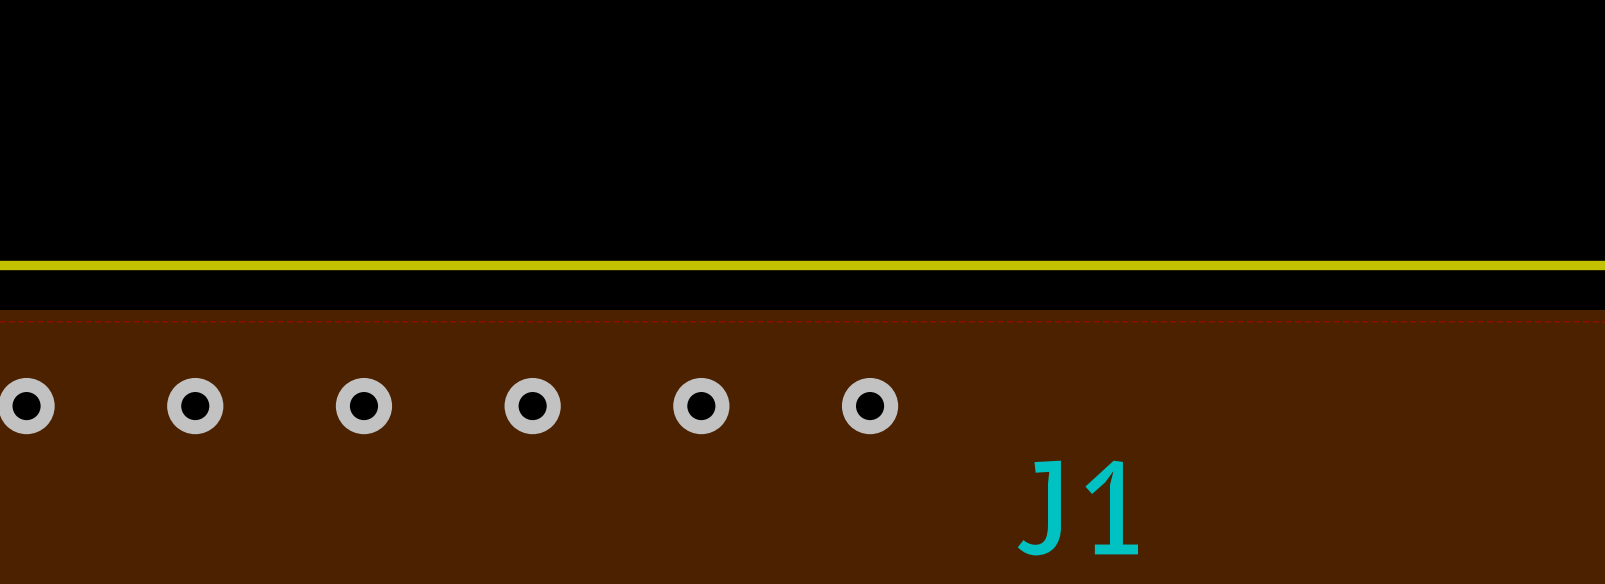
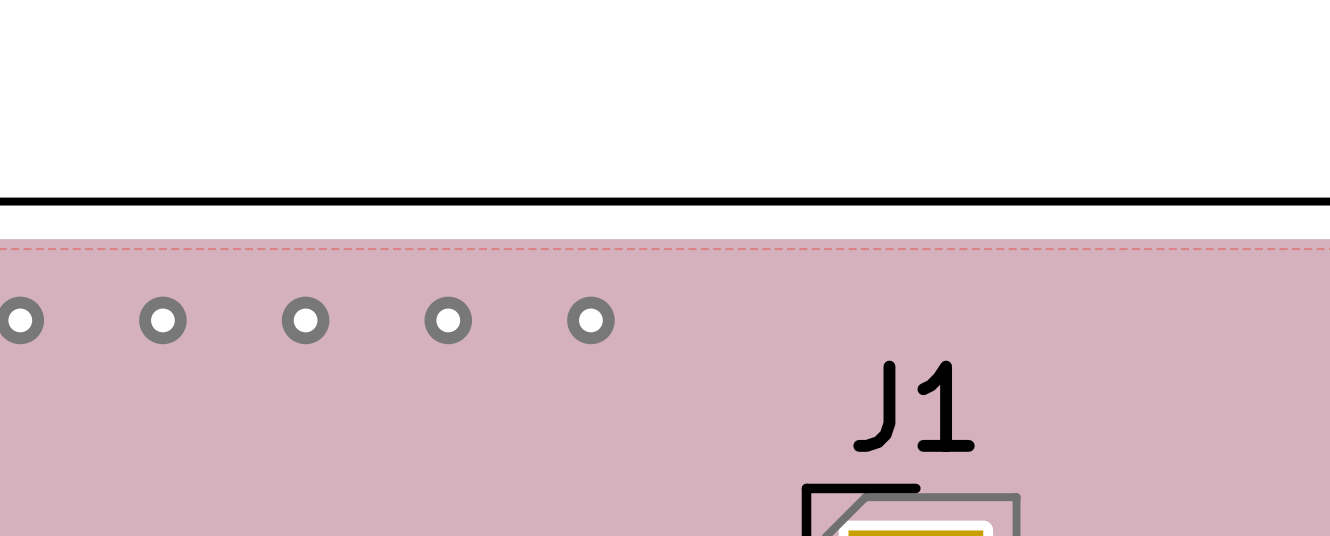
via: (870, 406) -> none

